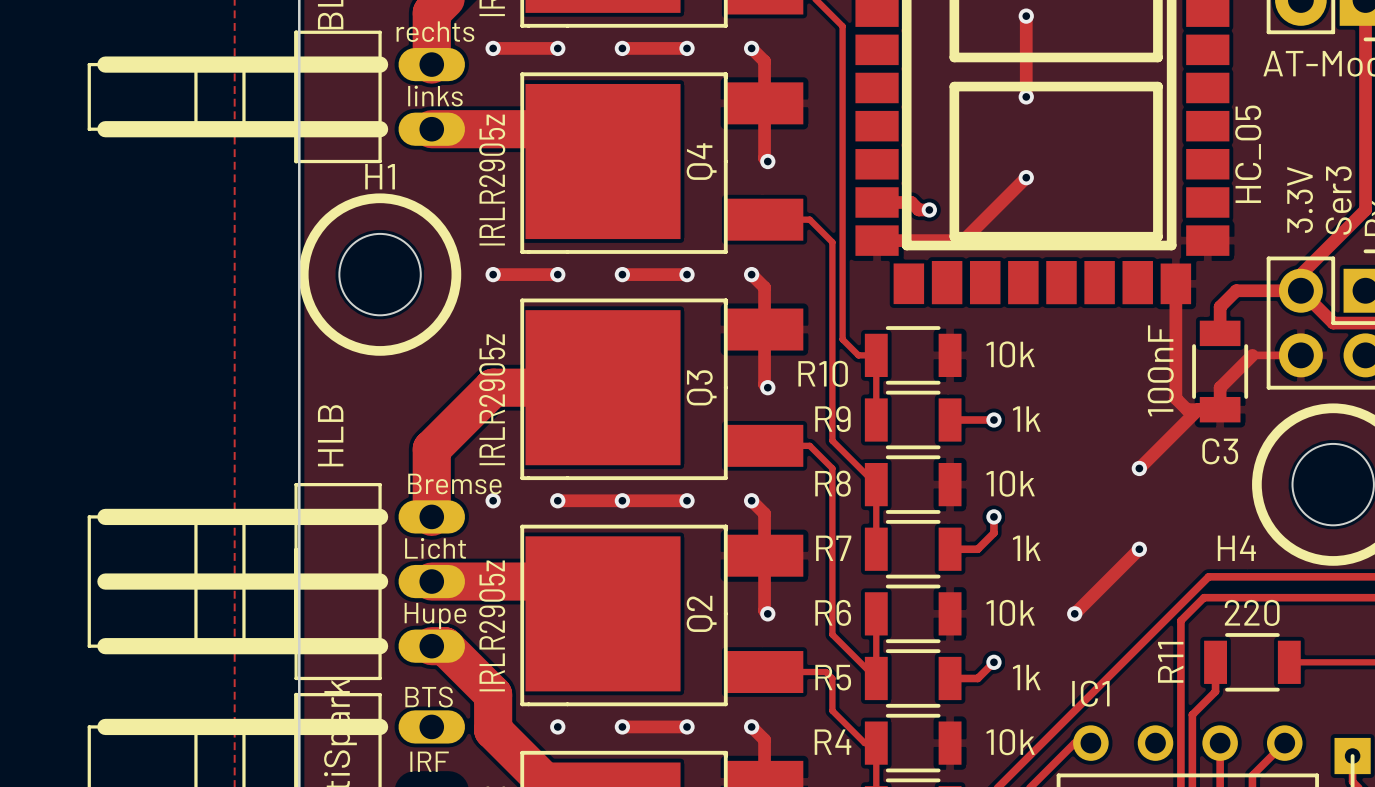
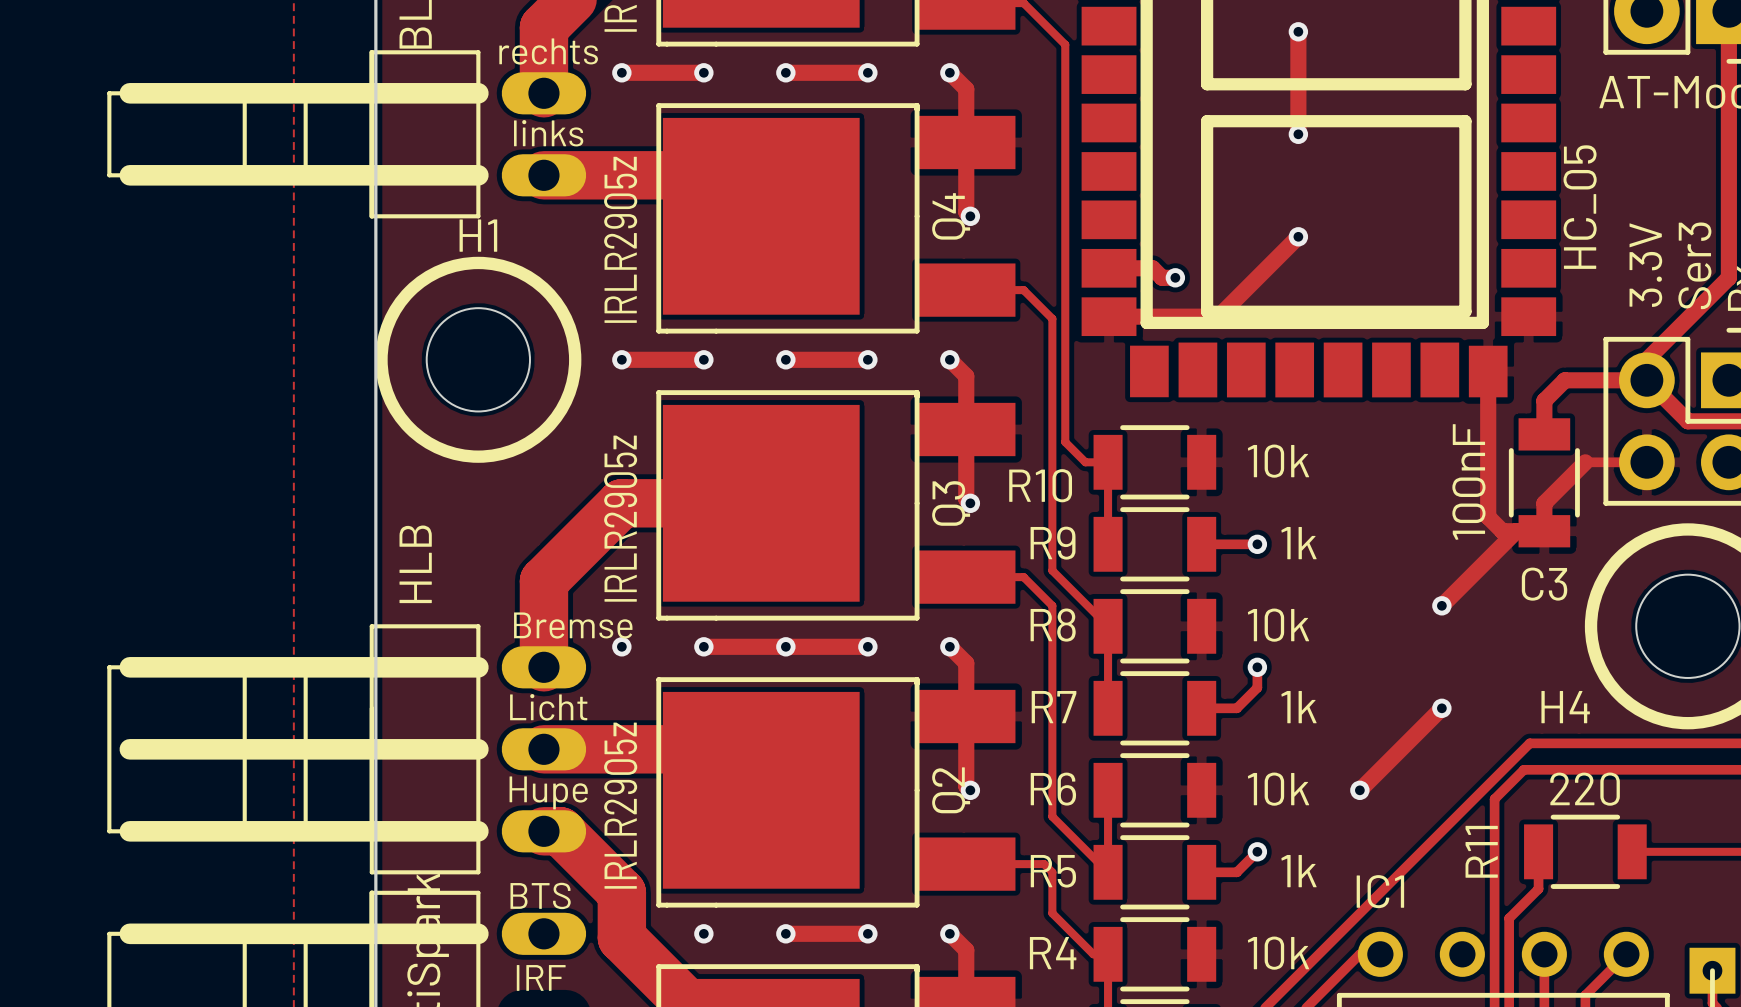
Q4 name position: Q4 (701, 161) -> Q4 (951, 216)
Q3 name position: Q3 (701, 387) -> Q3 (951, 503)
Q2 name position: Q2 (701, 613) -> Q2 (951, 790)

